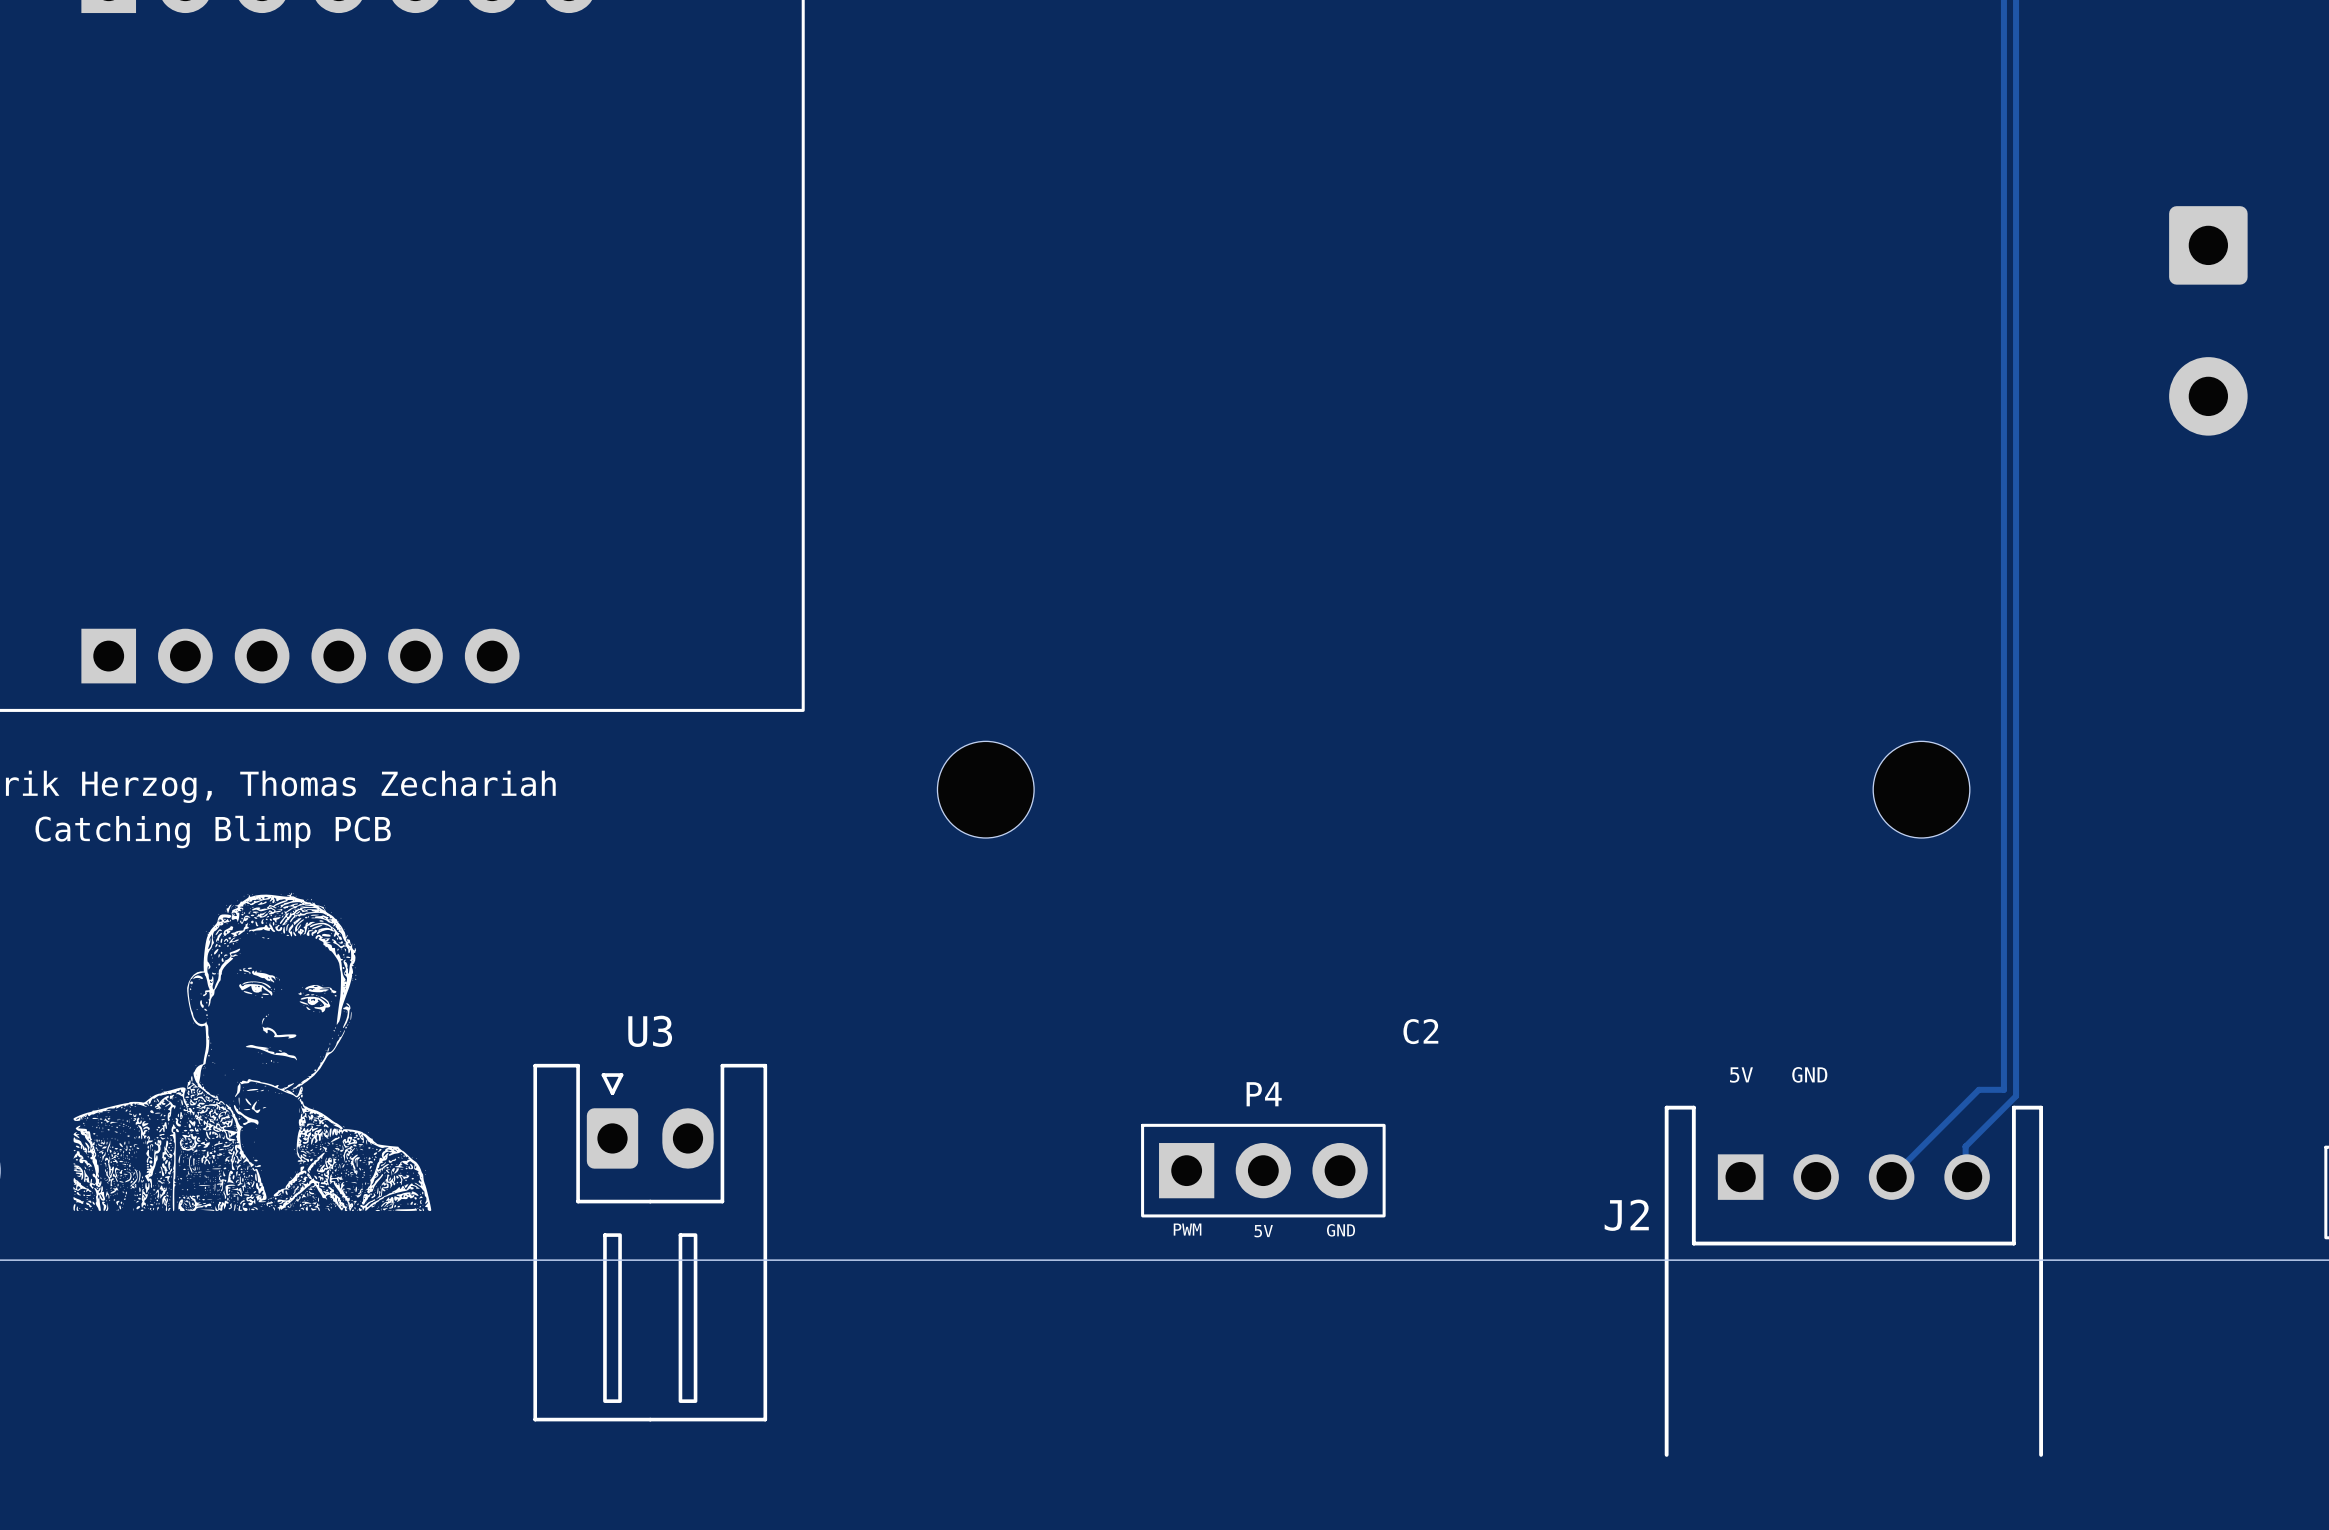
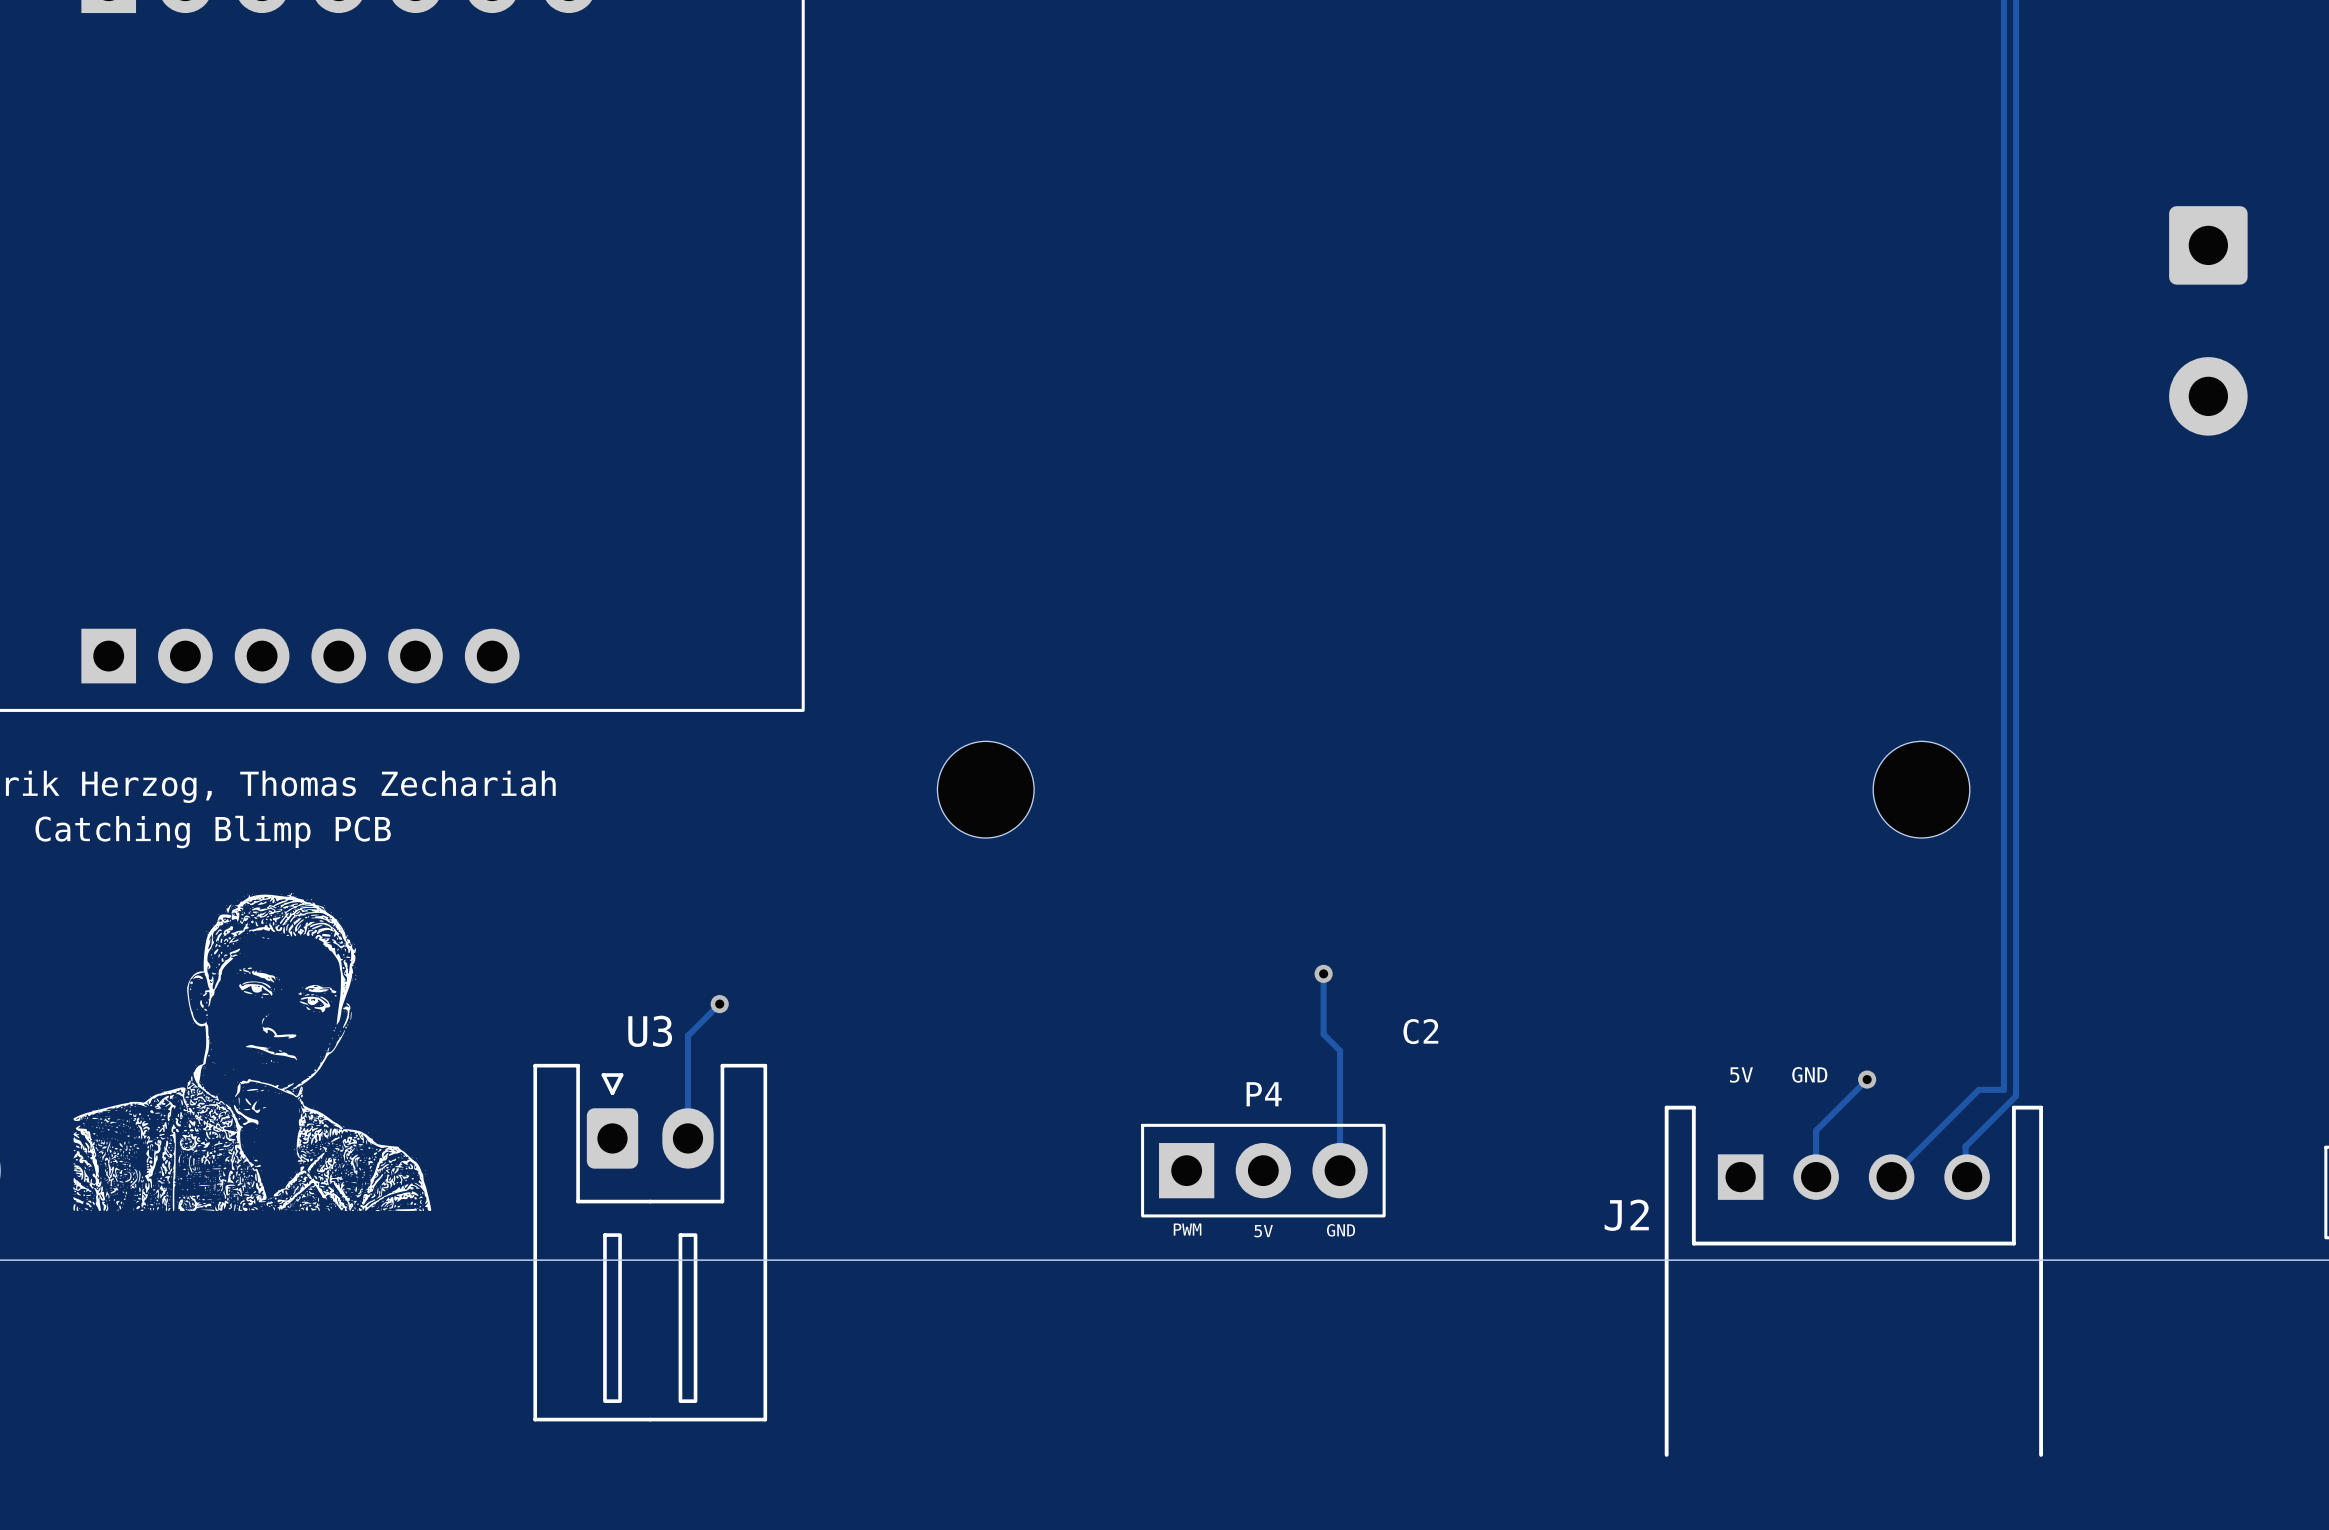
track: none -> (1323, 973) (1323, 1034) (1340, 1050) (1340, 1170)
via: none -> (1323, 973)
track: none -> (719, 1004) (687, 1035) (687, 1138)
via: none -> (719, 1004)
track: none -> (1867, 1079) (1816, 1130) (1816, 1177)
via: none -> (1867, 1079)

